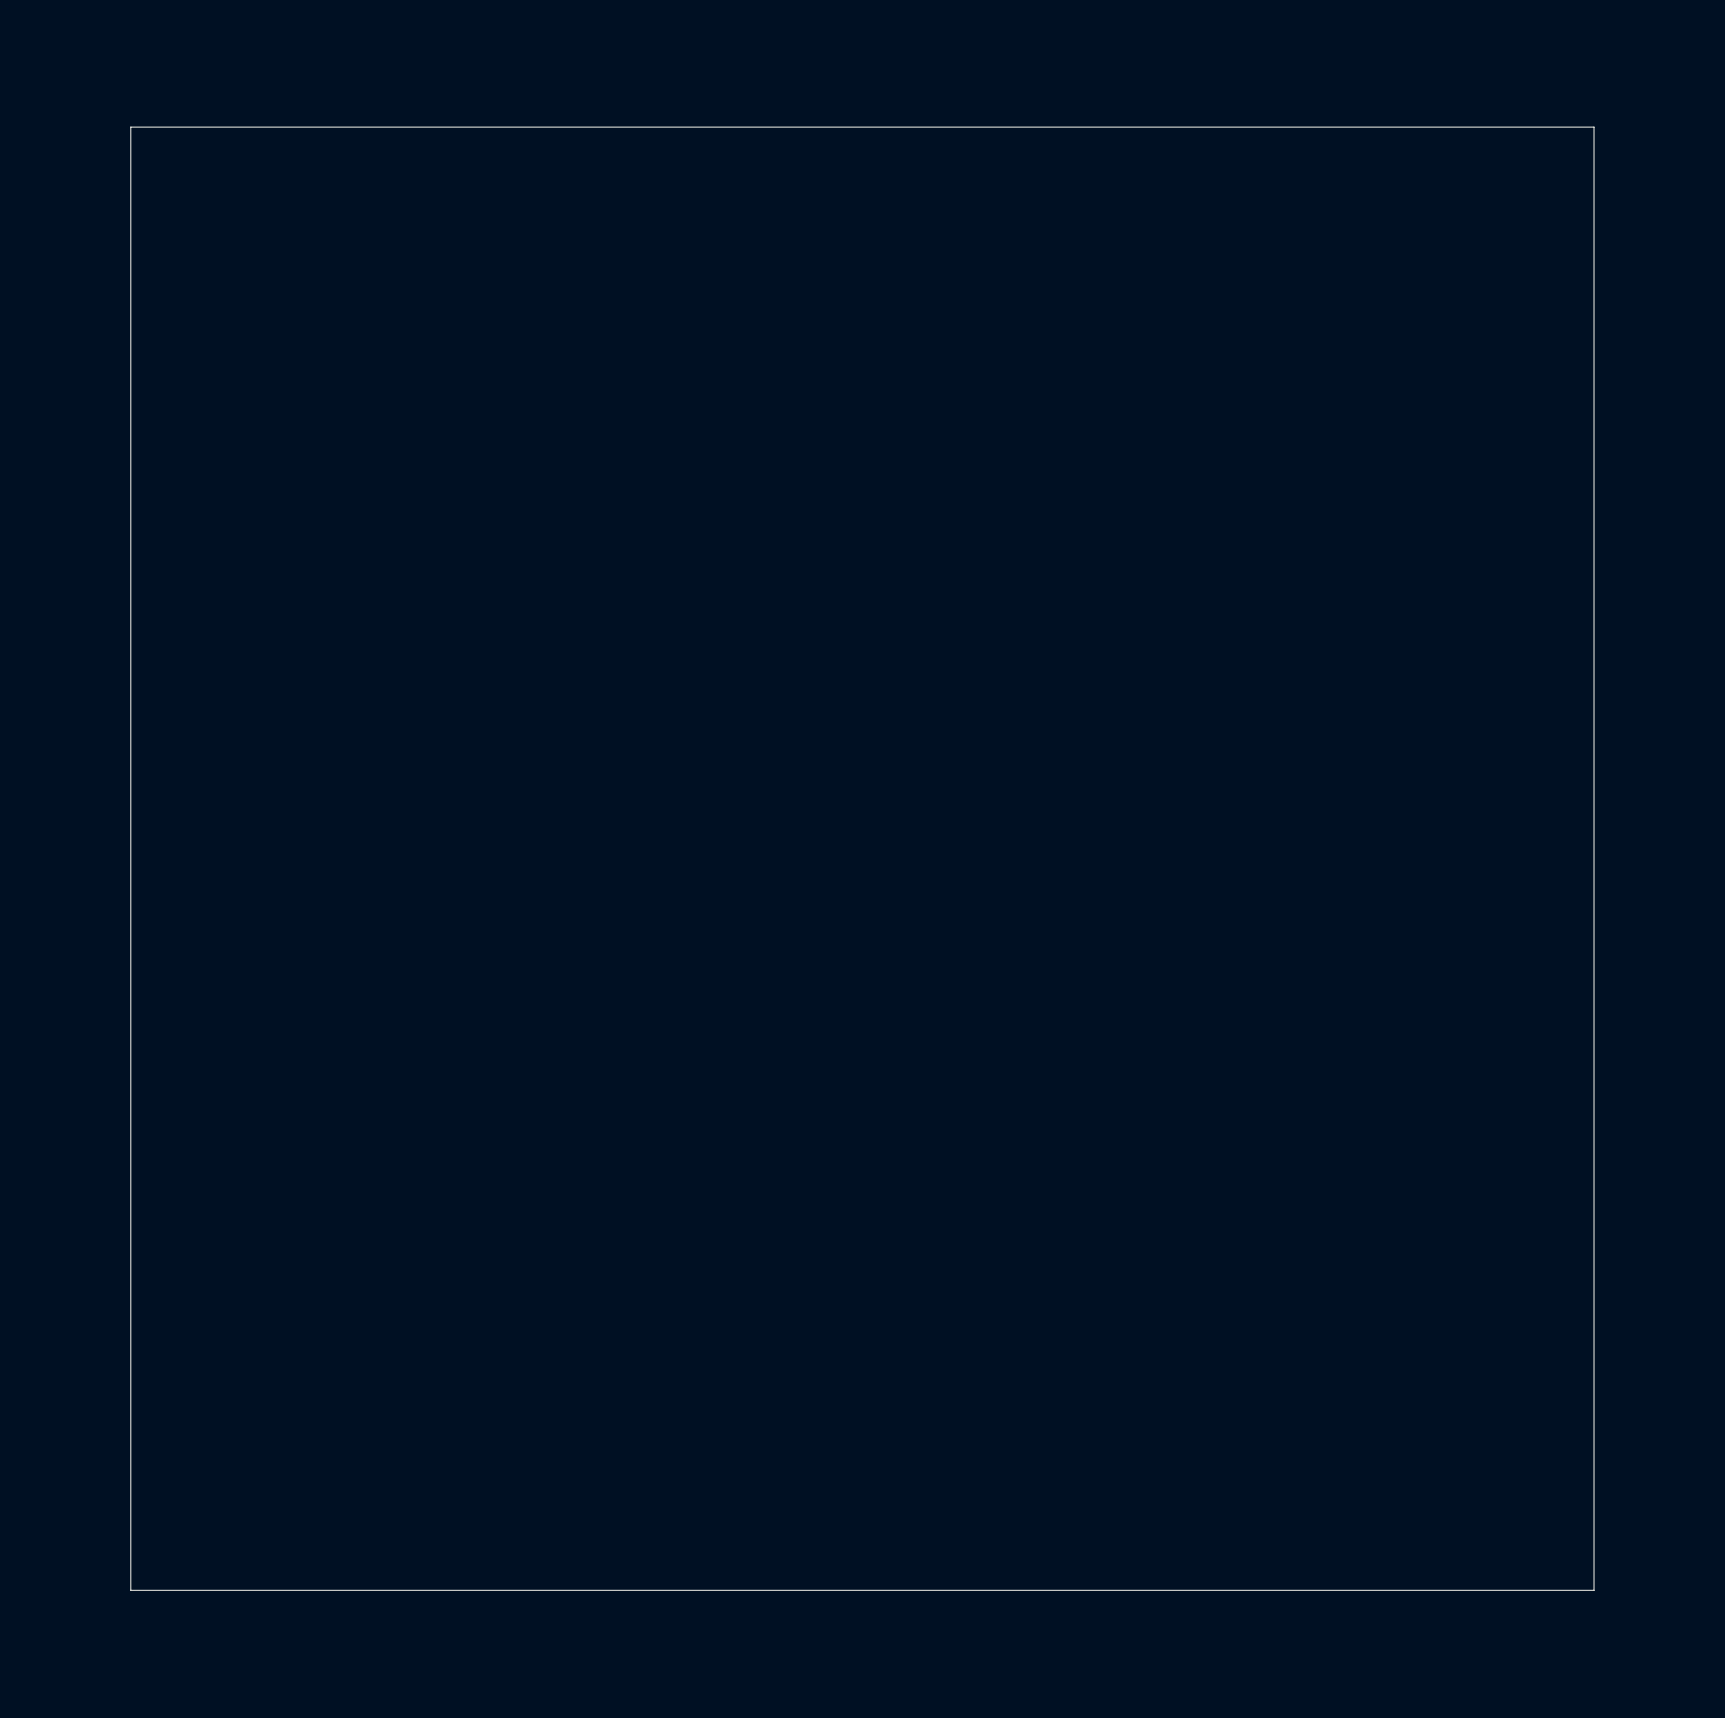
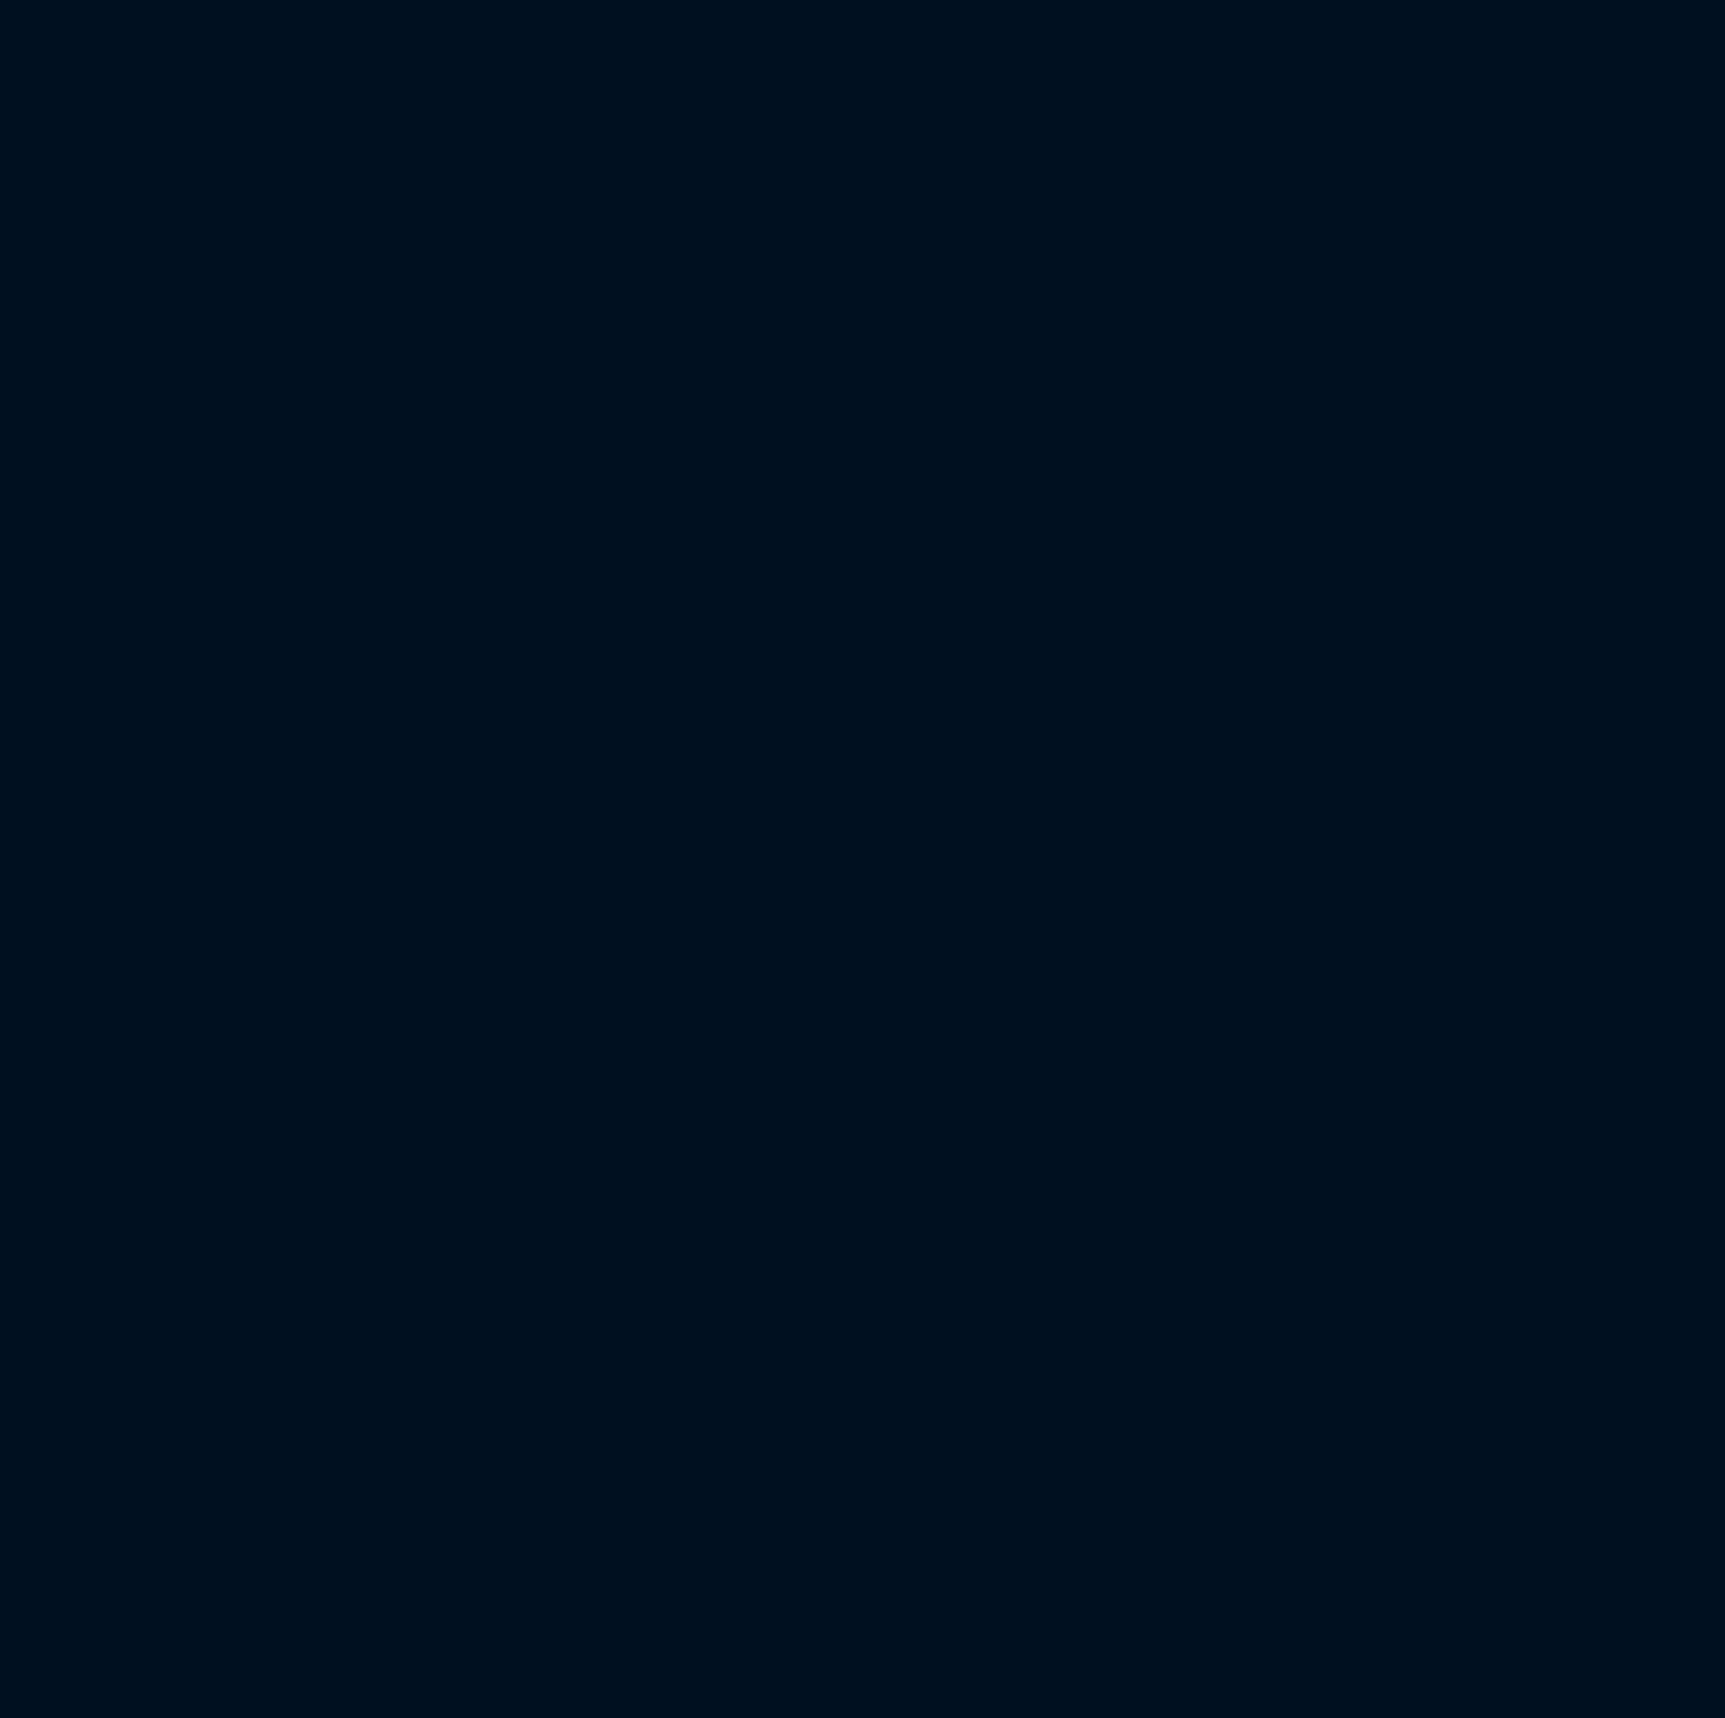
board edge: (130, 127) (1594, 127) (1594, 1590) (130, 1590) (130, 127) -> none

